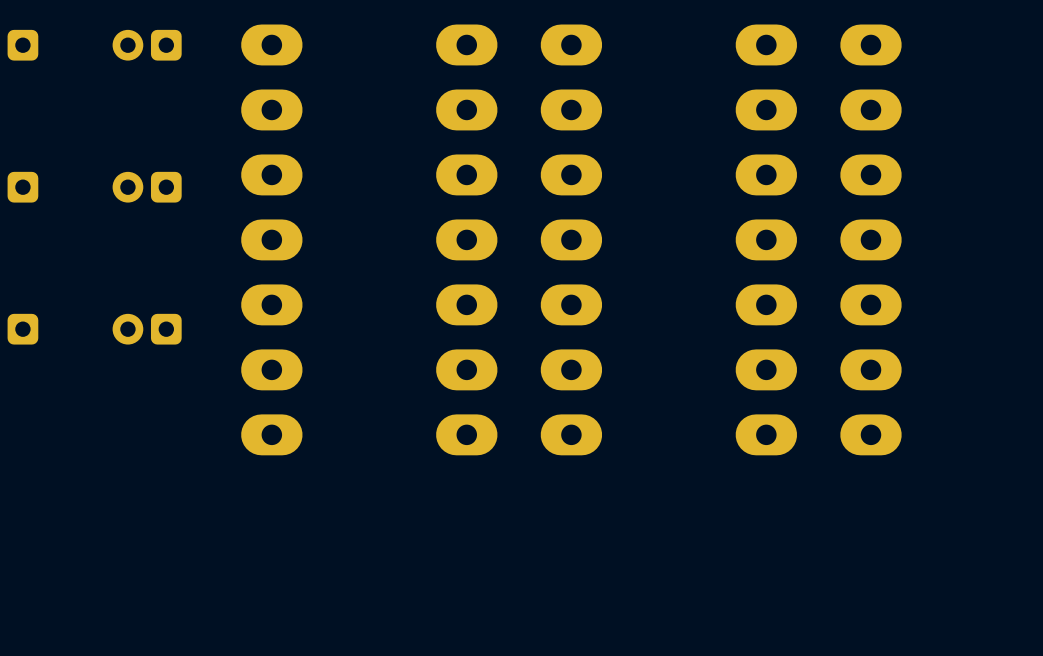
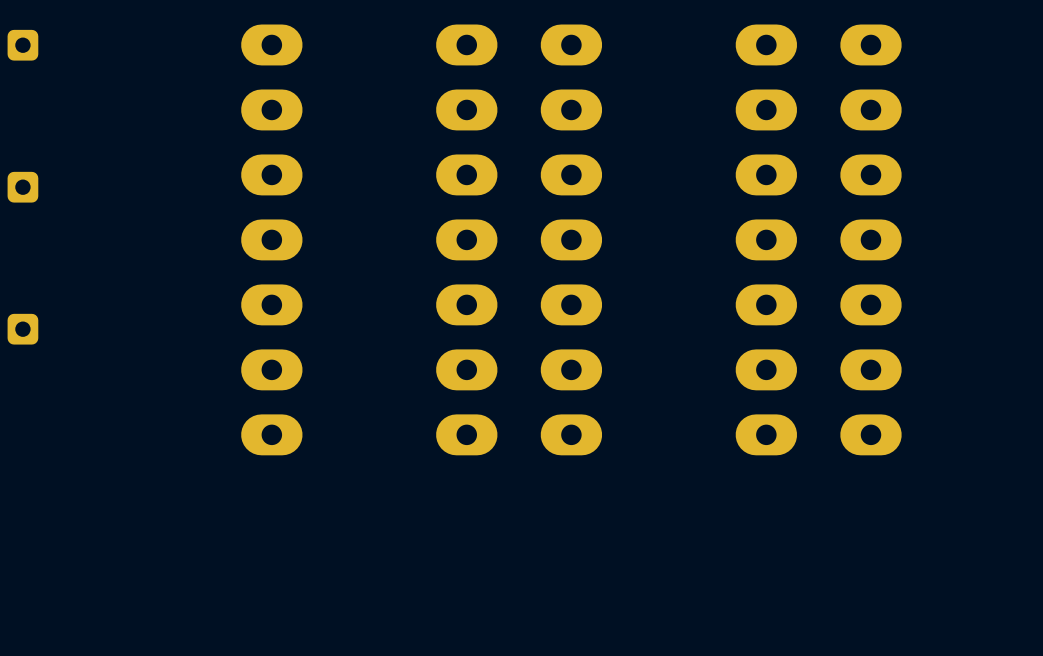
part: (147, 45) -> none
part: (147, 187) -> none
part: (147, 329) -> none

